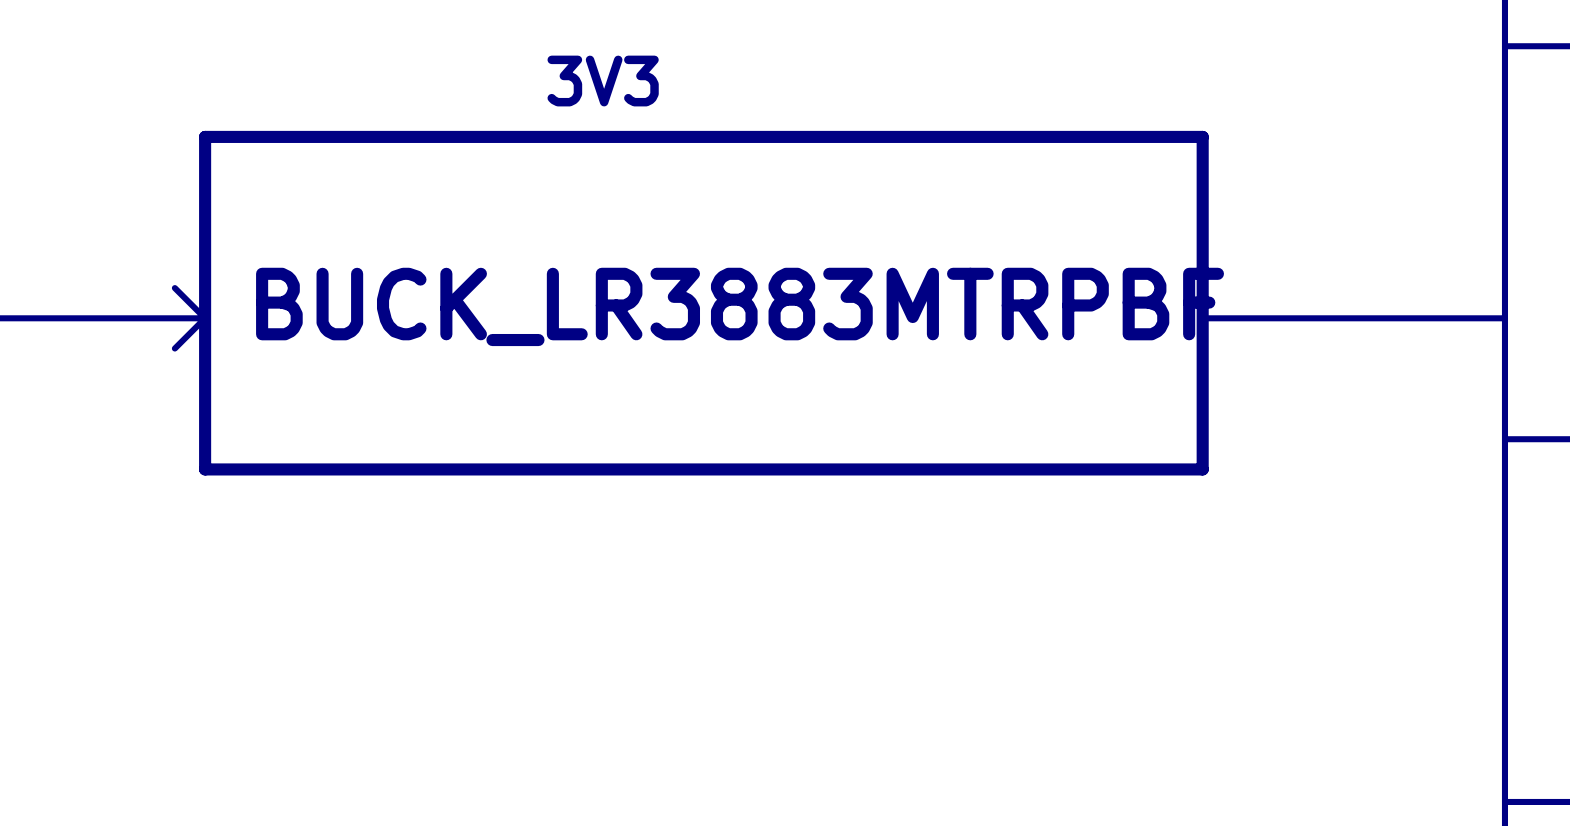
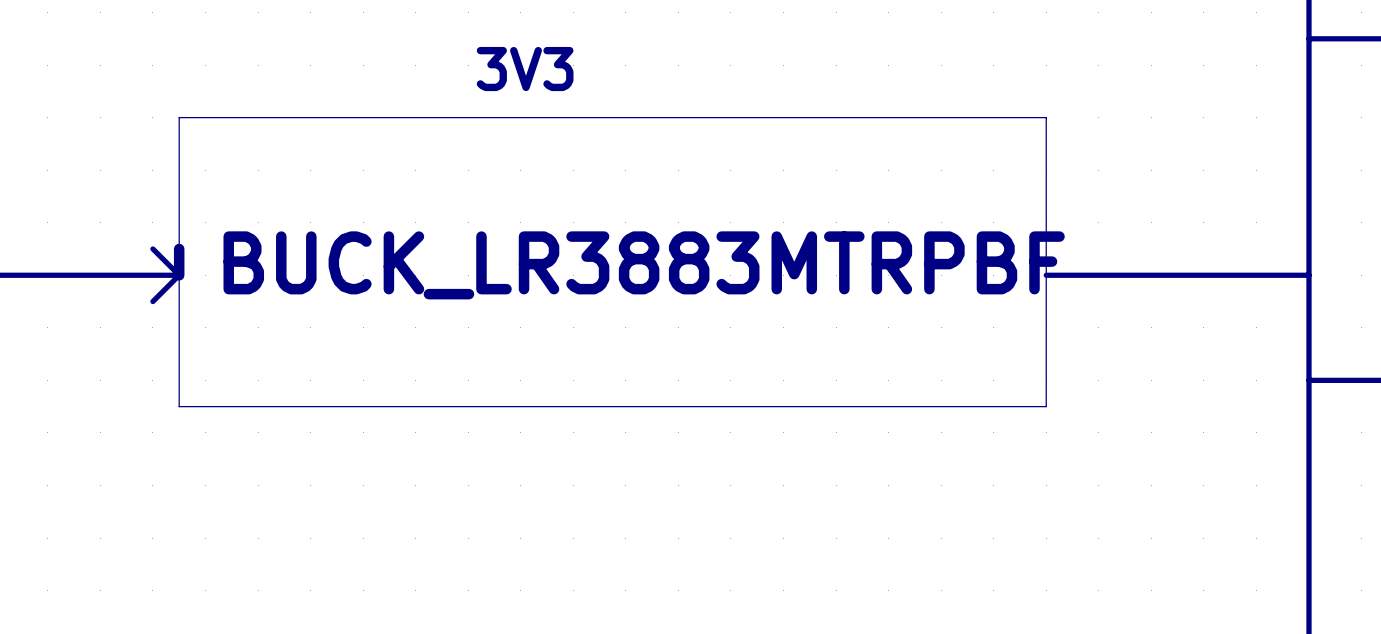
line width: thick (205, 288) (205, 136) (1202, 136) (1202, 469) (205, 469) (205, 318) -> thin (179, 248) (179, 117) (1046, 117) (1046, 406) (179, 406) (179, 275)

